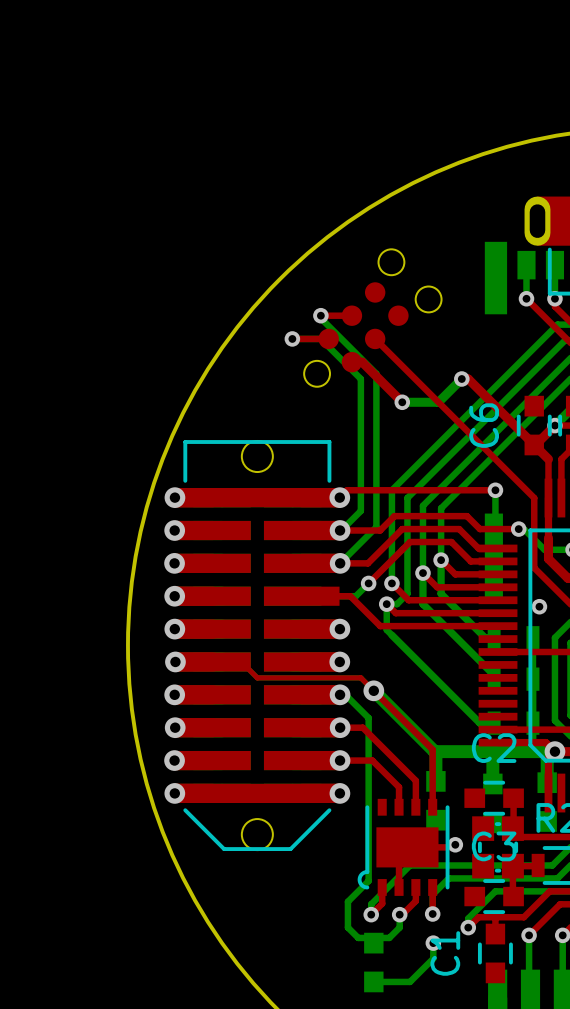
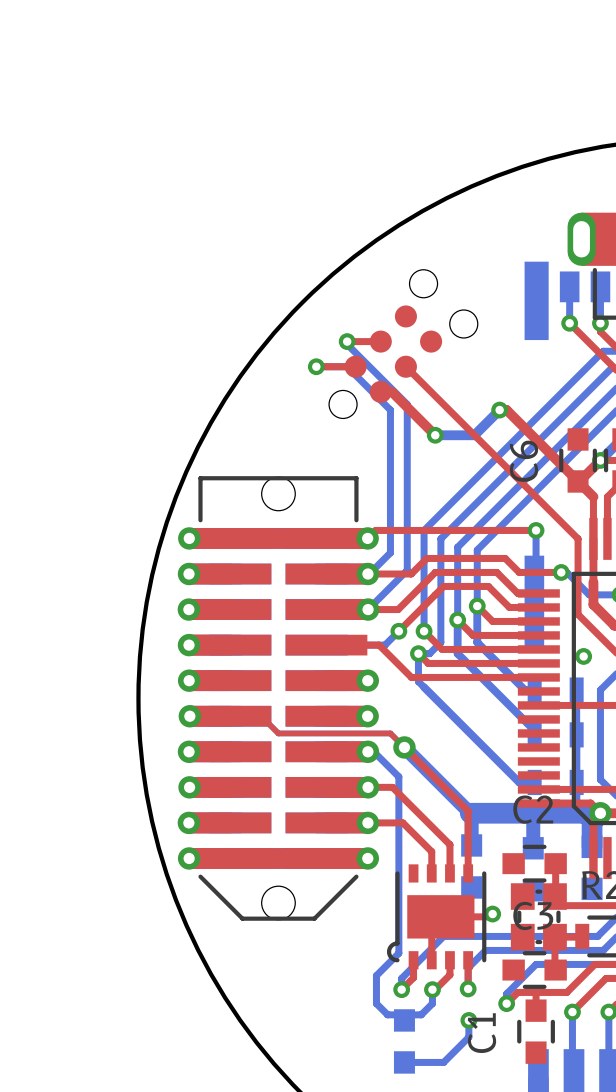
bottom track width: thin (434, 751) (554, 751) (547, 759) (547, 782) -> thick (470, 813) (600, 813) (592, 821) (592, 846)

